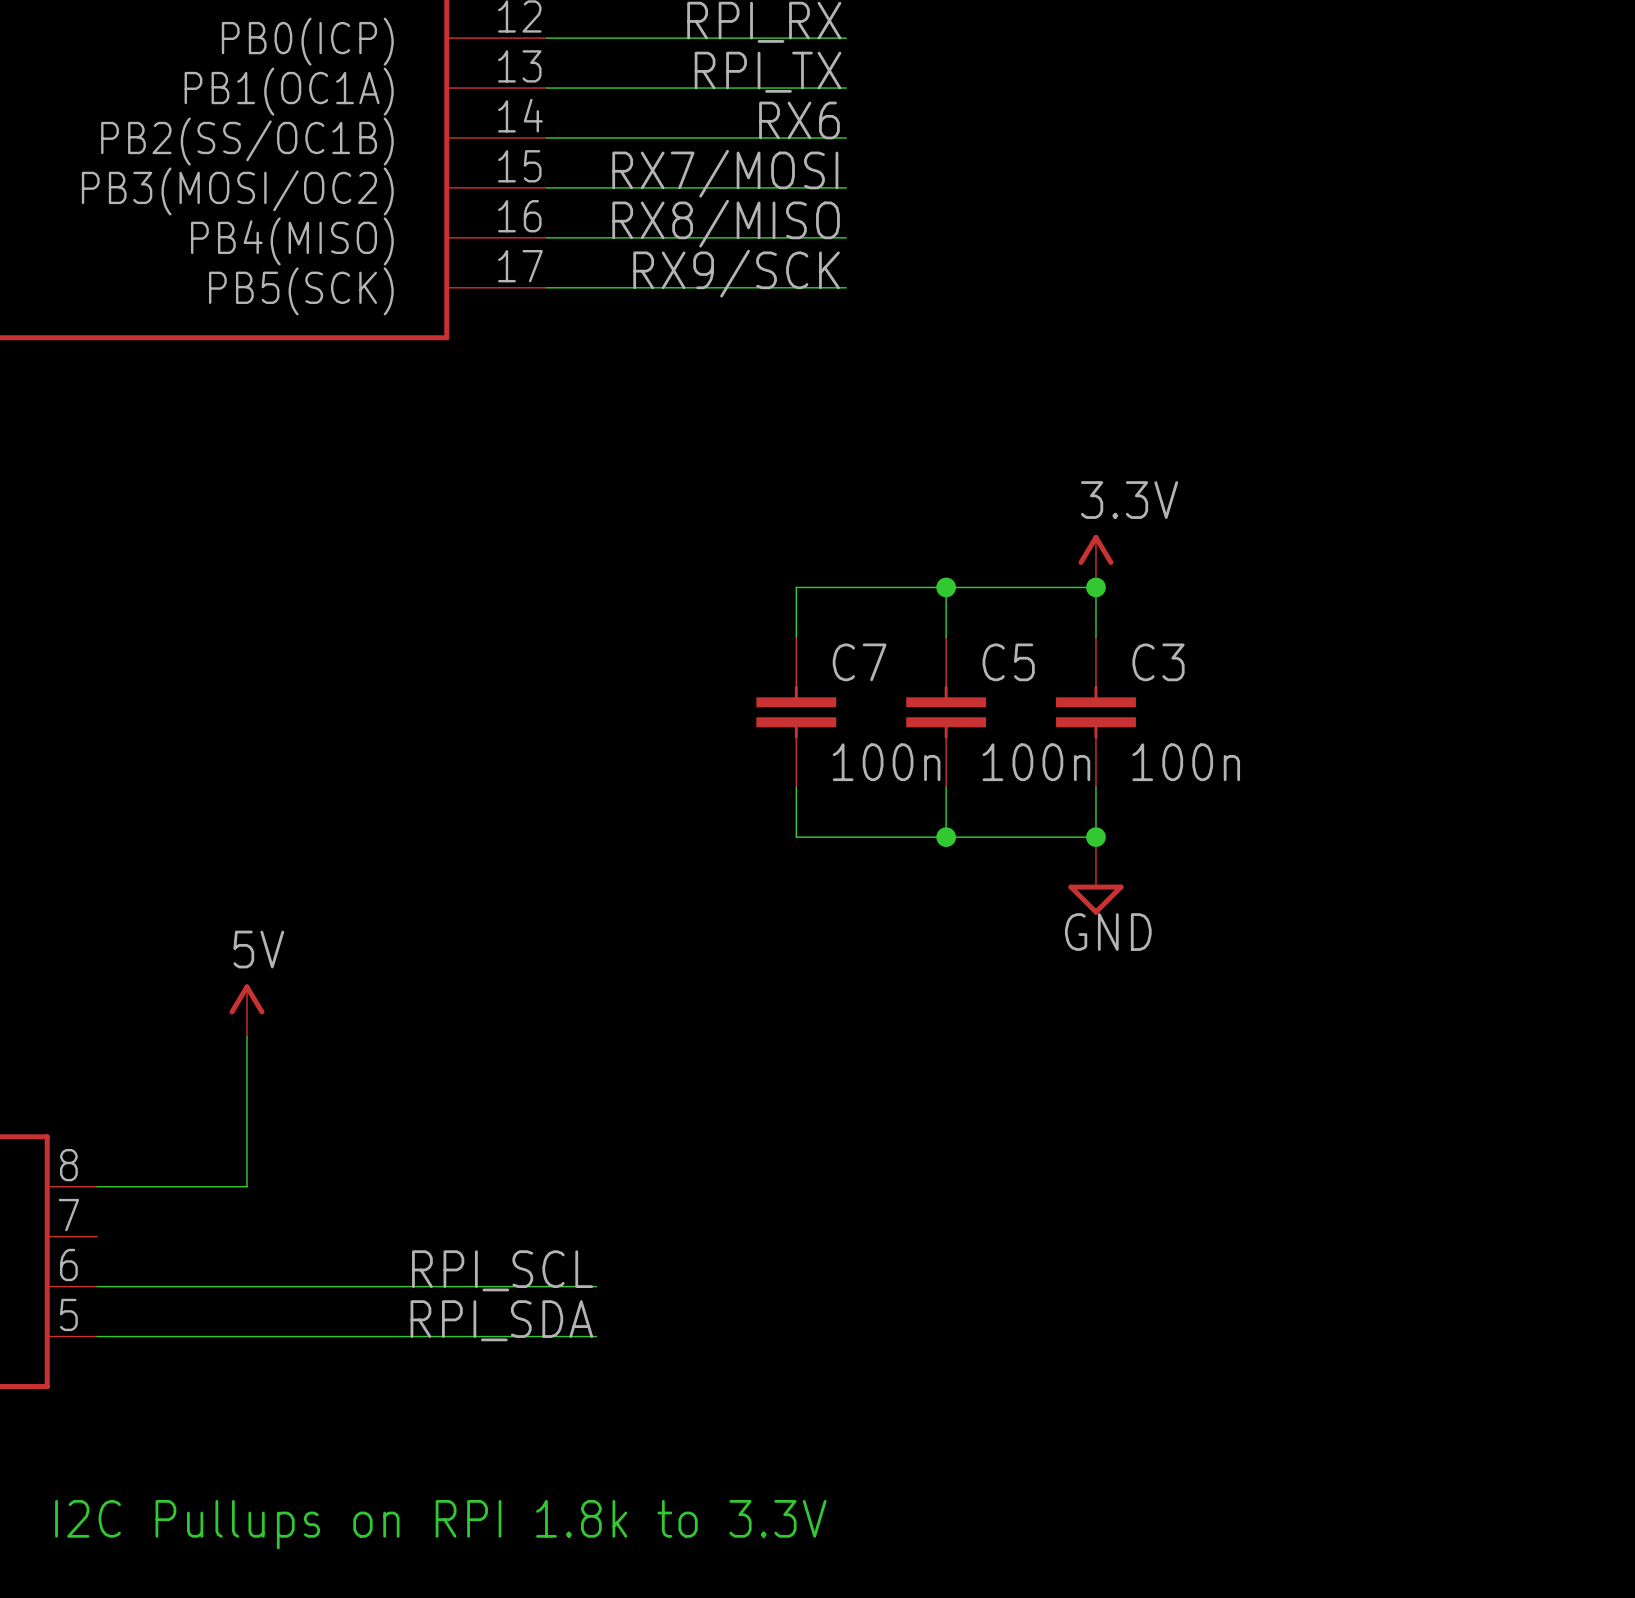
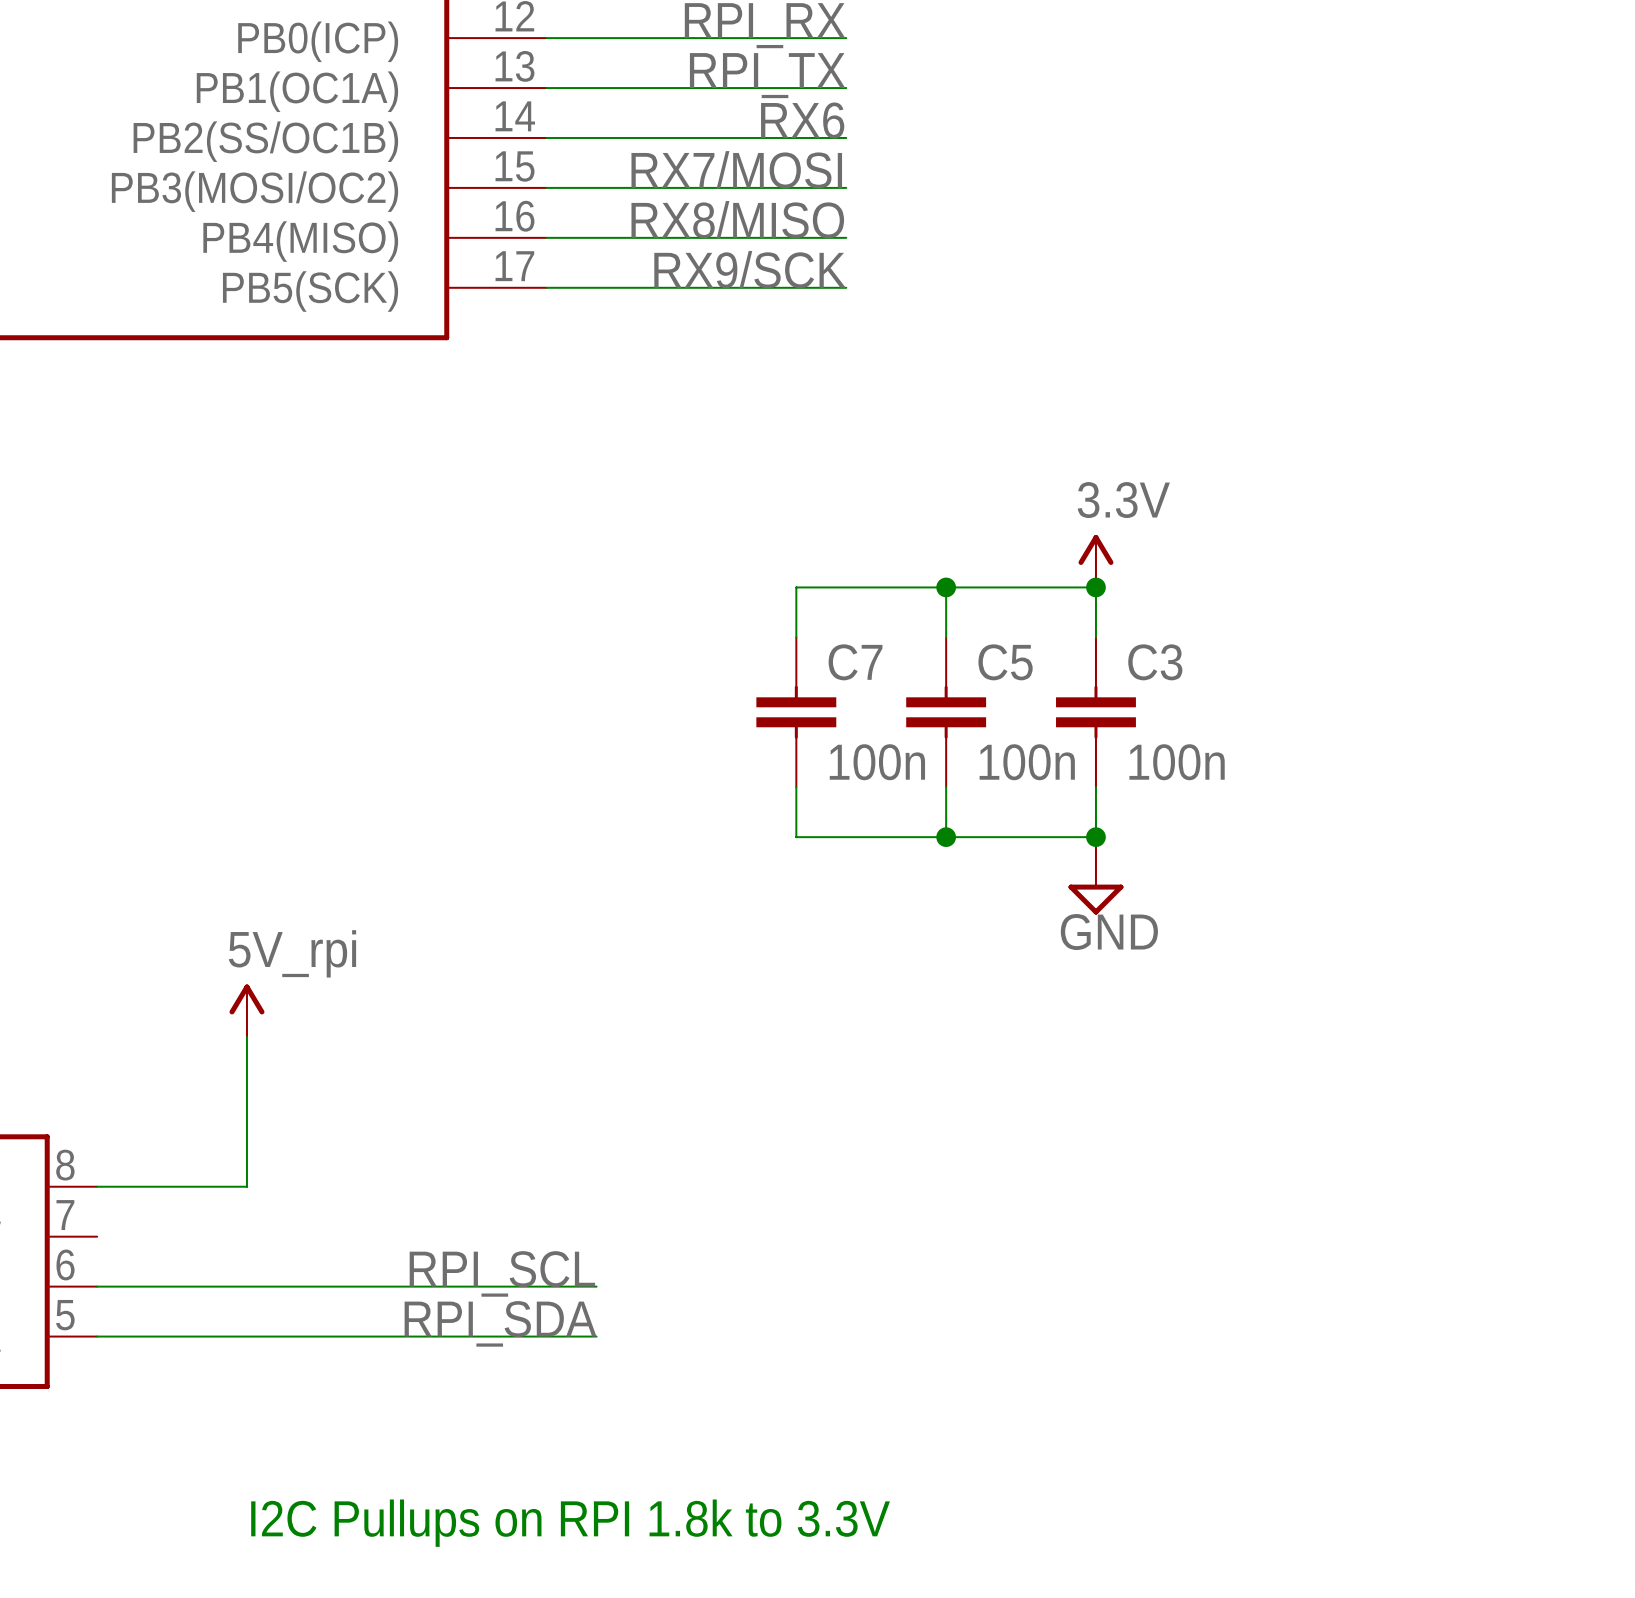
power symbol: 5V (246, 1010) -> 5V_rpi (246, 1010)
text position: I2C Pullups on RPI 1.8k to 3.3V (440, 1524) -> I2C Pullups on RPI 1.8k to 3.3V (570, 1523)

